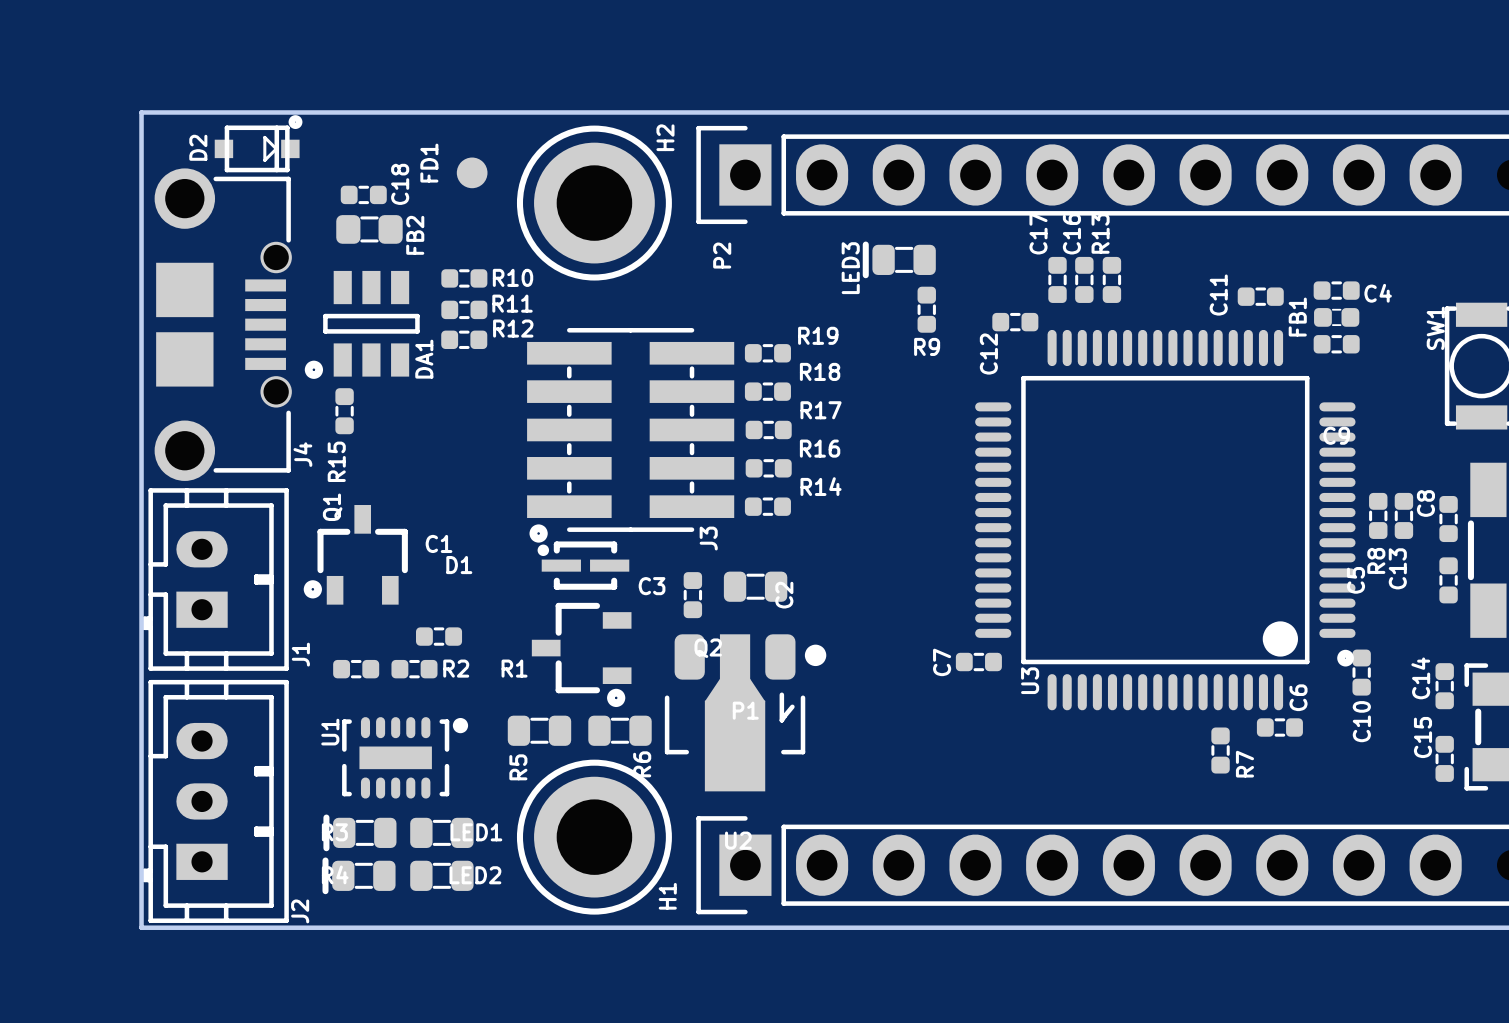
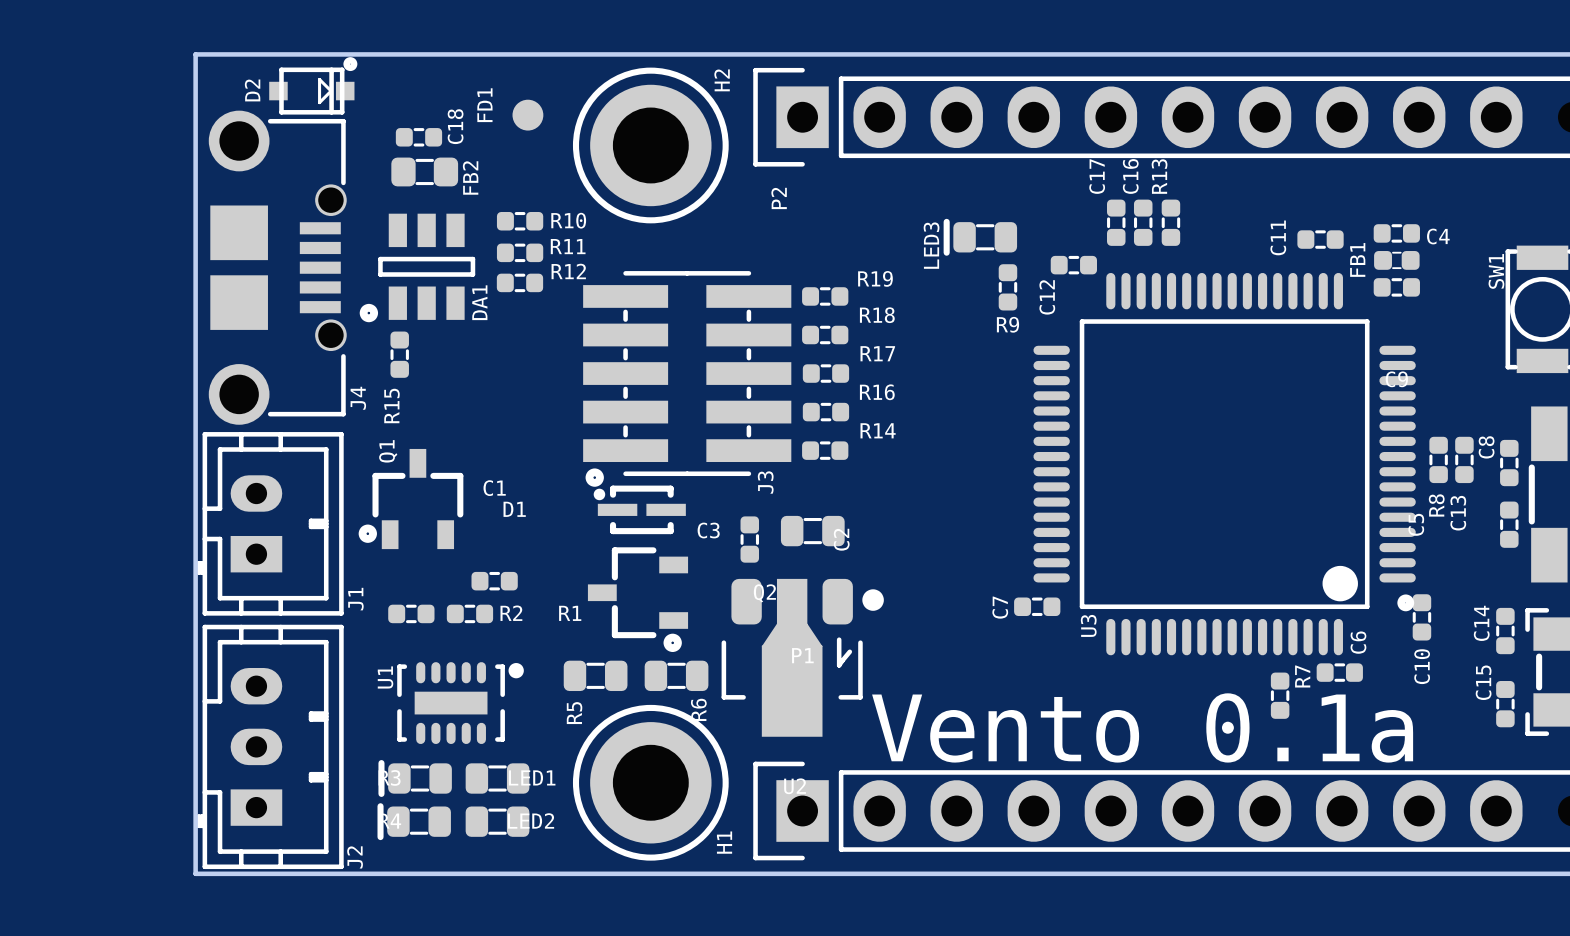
LED3 position: (899, 259) -> (980, 237)
R9 position: (926, 309) -> (1007, 287)
R7 name position: R7 (1244, 764) -> R7 (1302, 676)
text: none -> Vento 0.1a (1142, 727)

